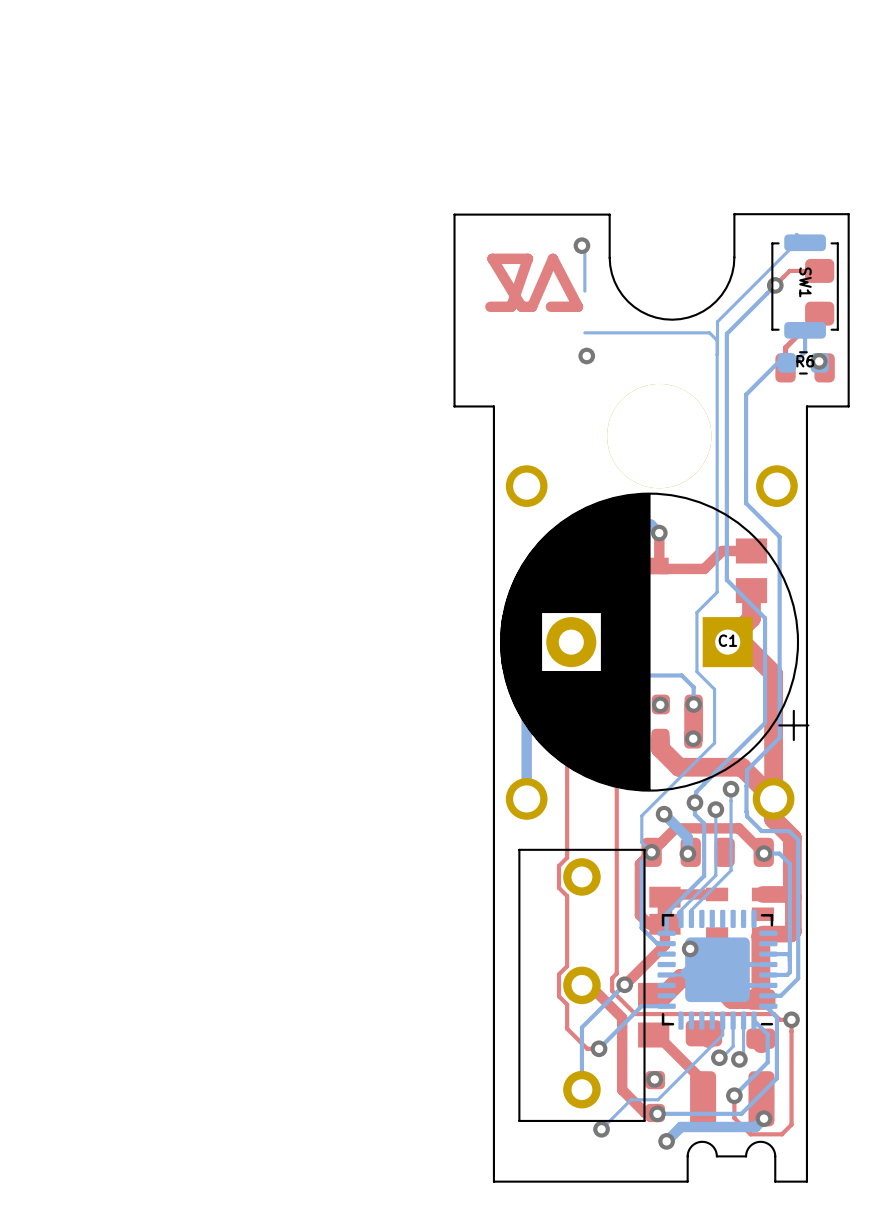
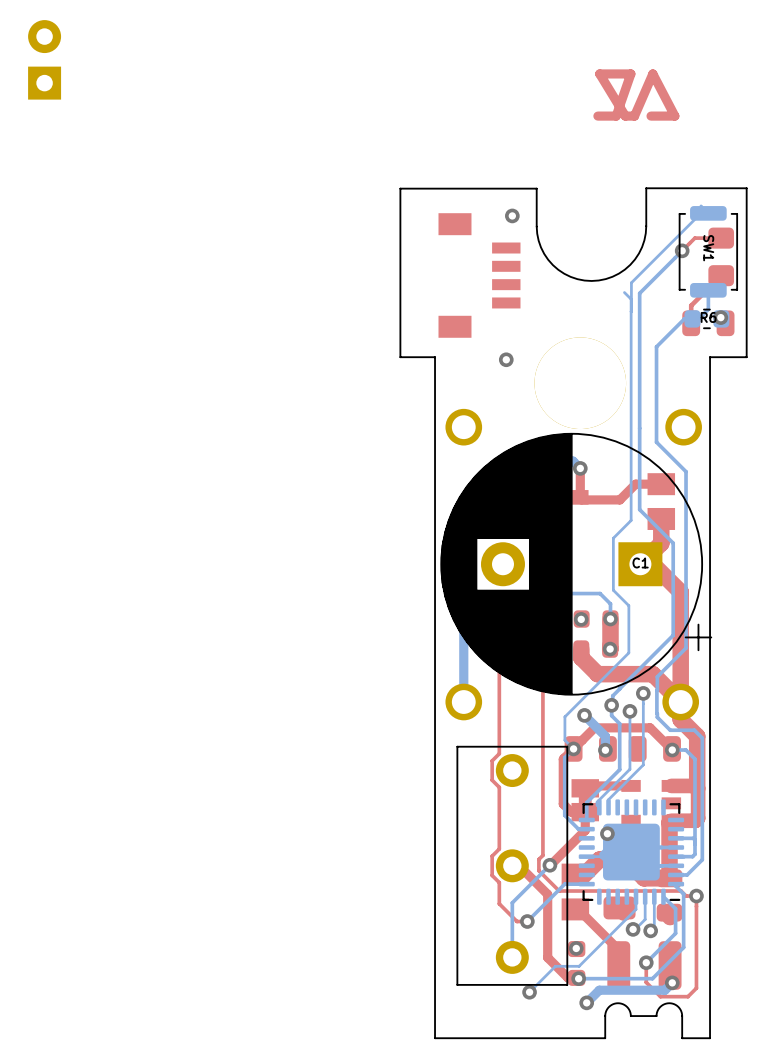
part: none -> (44, 59)
bottom track: (584, 248) (584, 291) -> none
drawing position: (534, 282) -> (636, 95)
part: none -> (479, 275)
bottom track: (709, 332) (584, 332) -> none
via position: (586, 355) -> (506, 359)

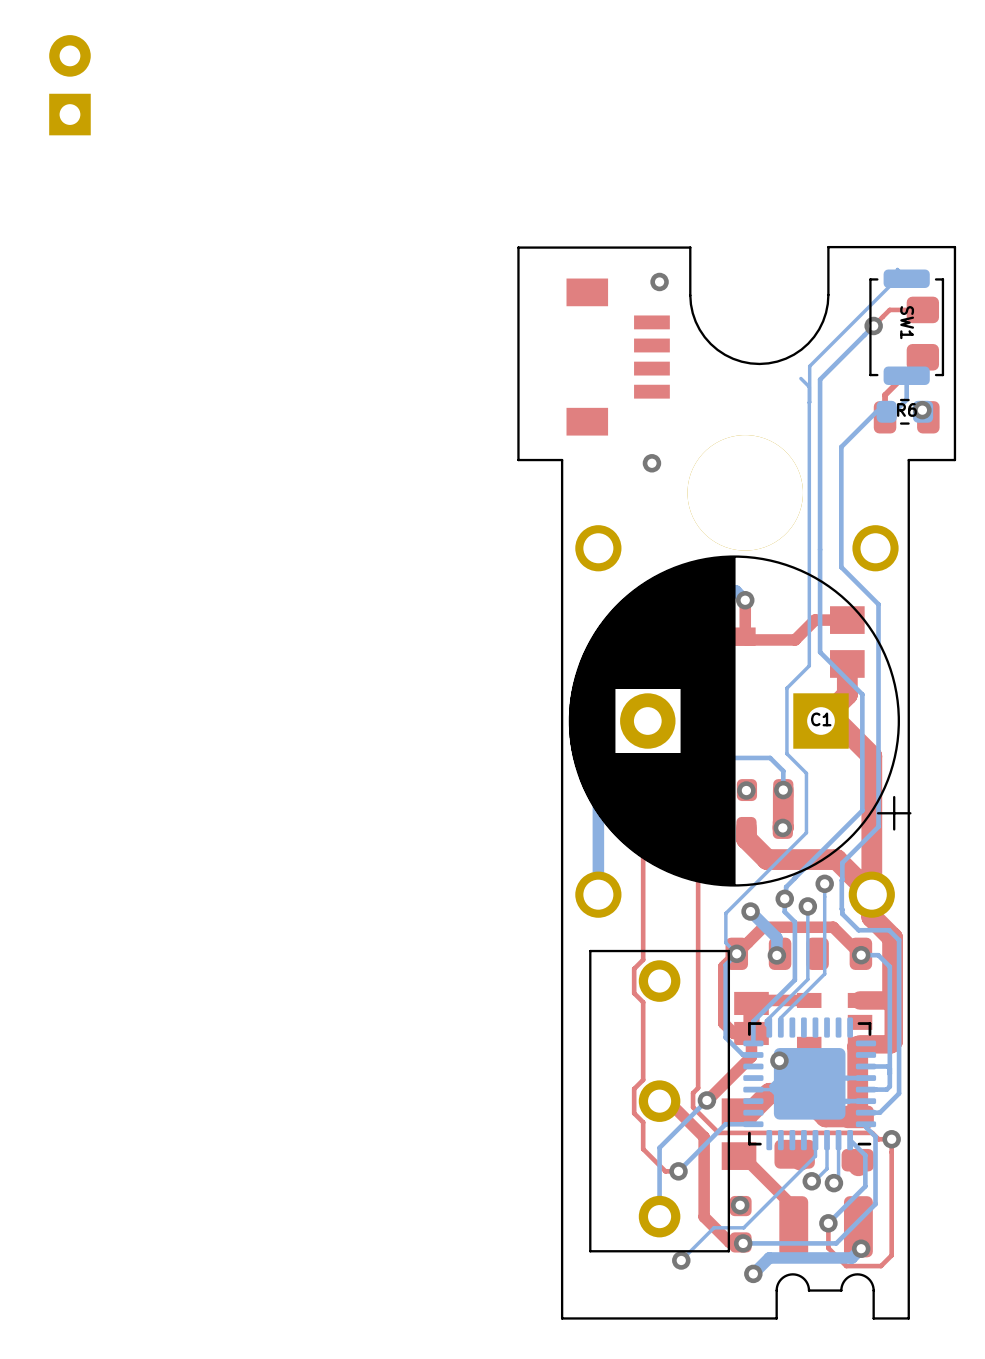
drawing: [593, 69, 680, 121] -> none

